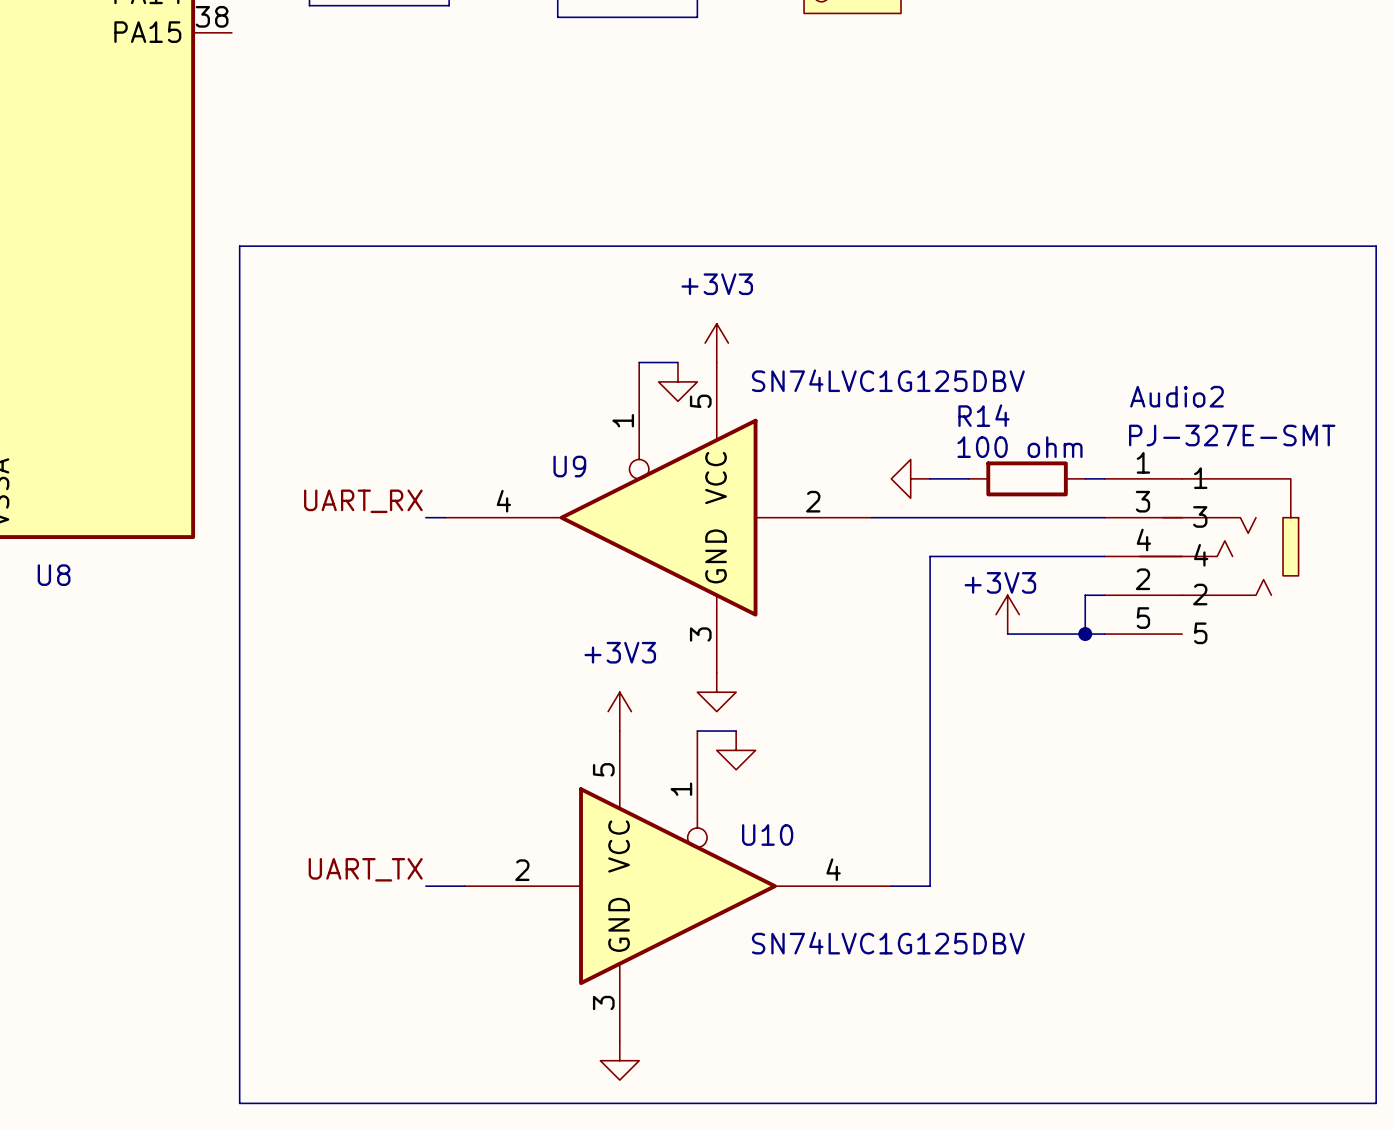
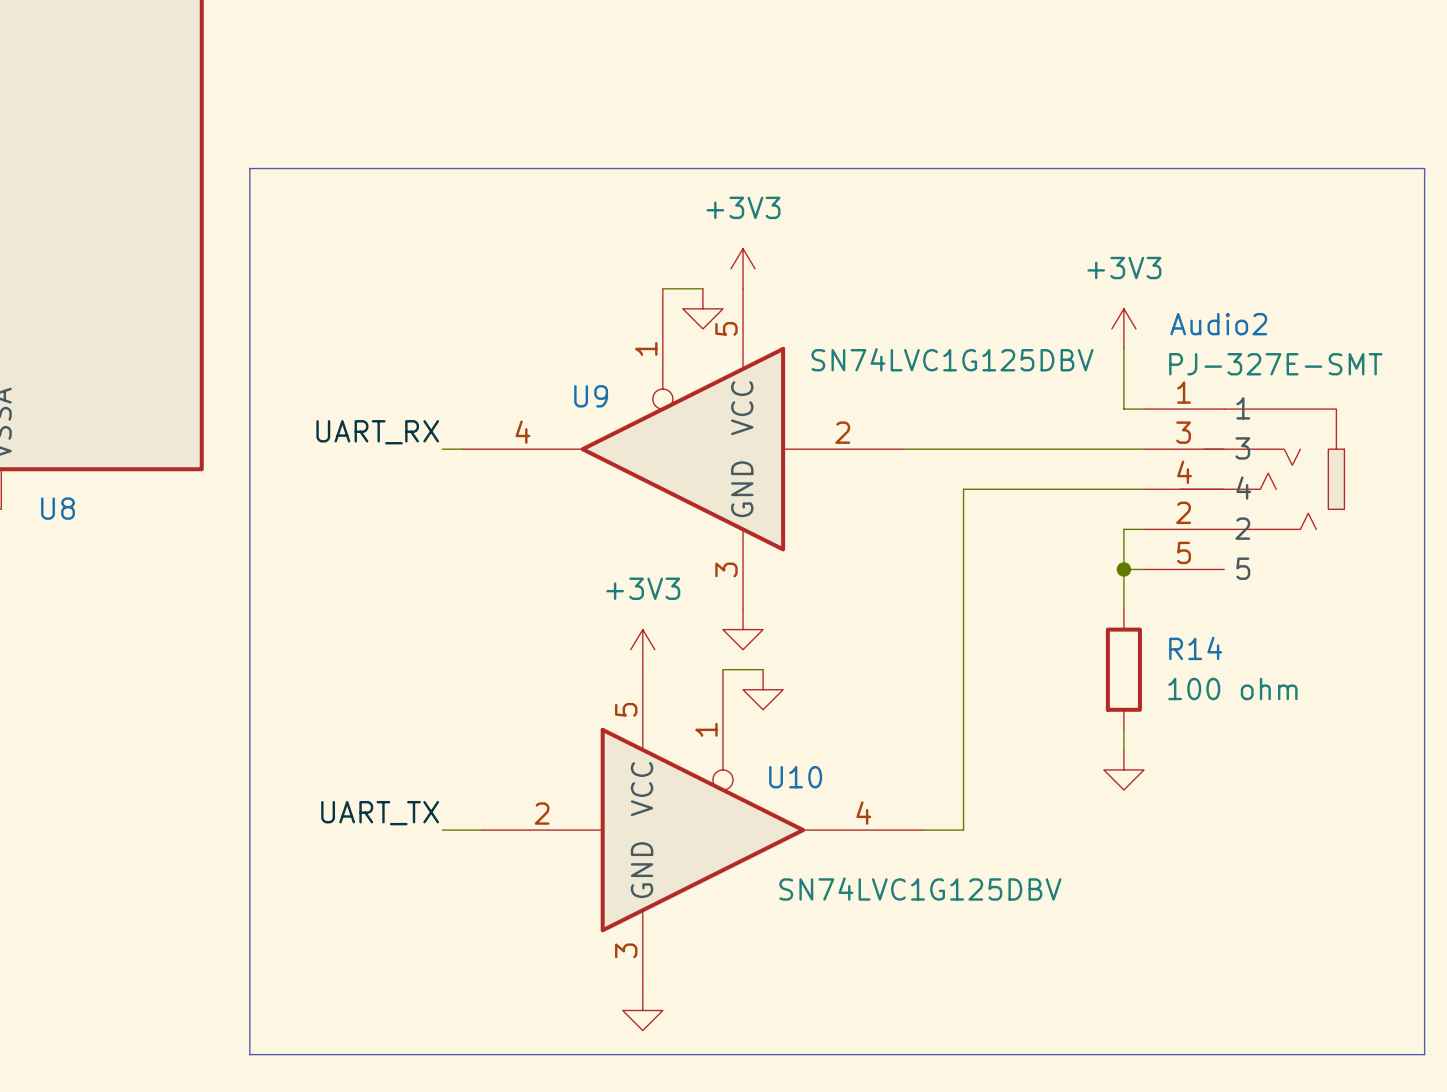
U9 value position: SN74LVC1G125DBV (888, 380) -> SN74LVC1G125DBV (952, 359)
wire: none -> (1123, 348) (1123, 409)
R14 value position: 100 ohm (1020, 447) -> 100 ohm (1232, 689)
power symbol: (910, 478) -> none
wire: (930, 478) (968, 478) -> none
R14 rotation: 0° (1027, 478) -> 90° clockwise (1123, 669)
R14 position: (1027, 478) -> (1123, 669)
power symbol text position: +3V3 (1000, 582) -> +3V3 (1124, 268)
power symbol position: +3V3 (1007, 614) -> +3V3 (1123, 328)
wire: (1007, 634) (1085, 634) -> (1123, 609) (1123, 569)
wire: none -> (1123, 729) (1123, 749)
power symbol: none -> (1123, 769)

